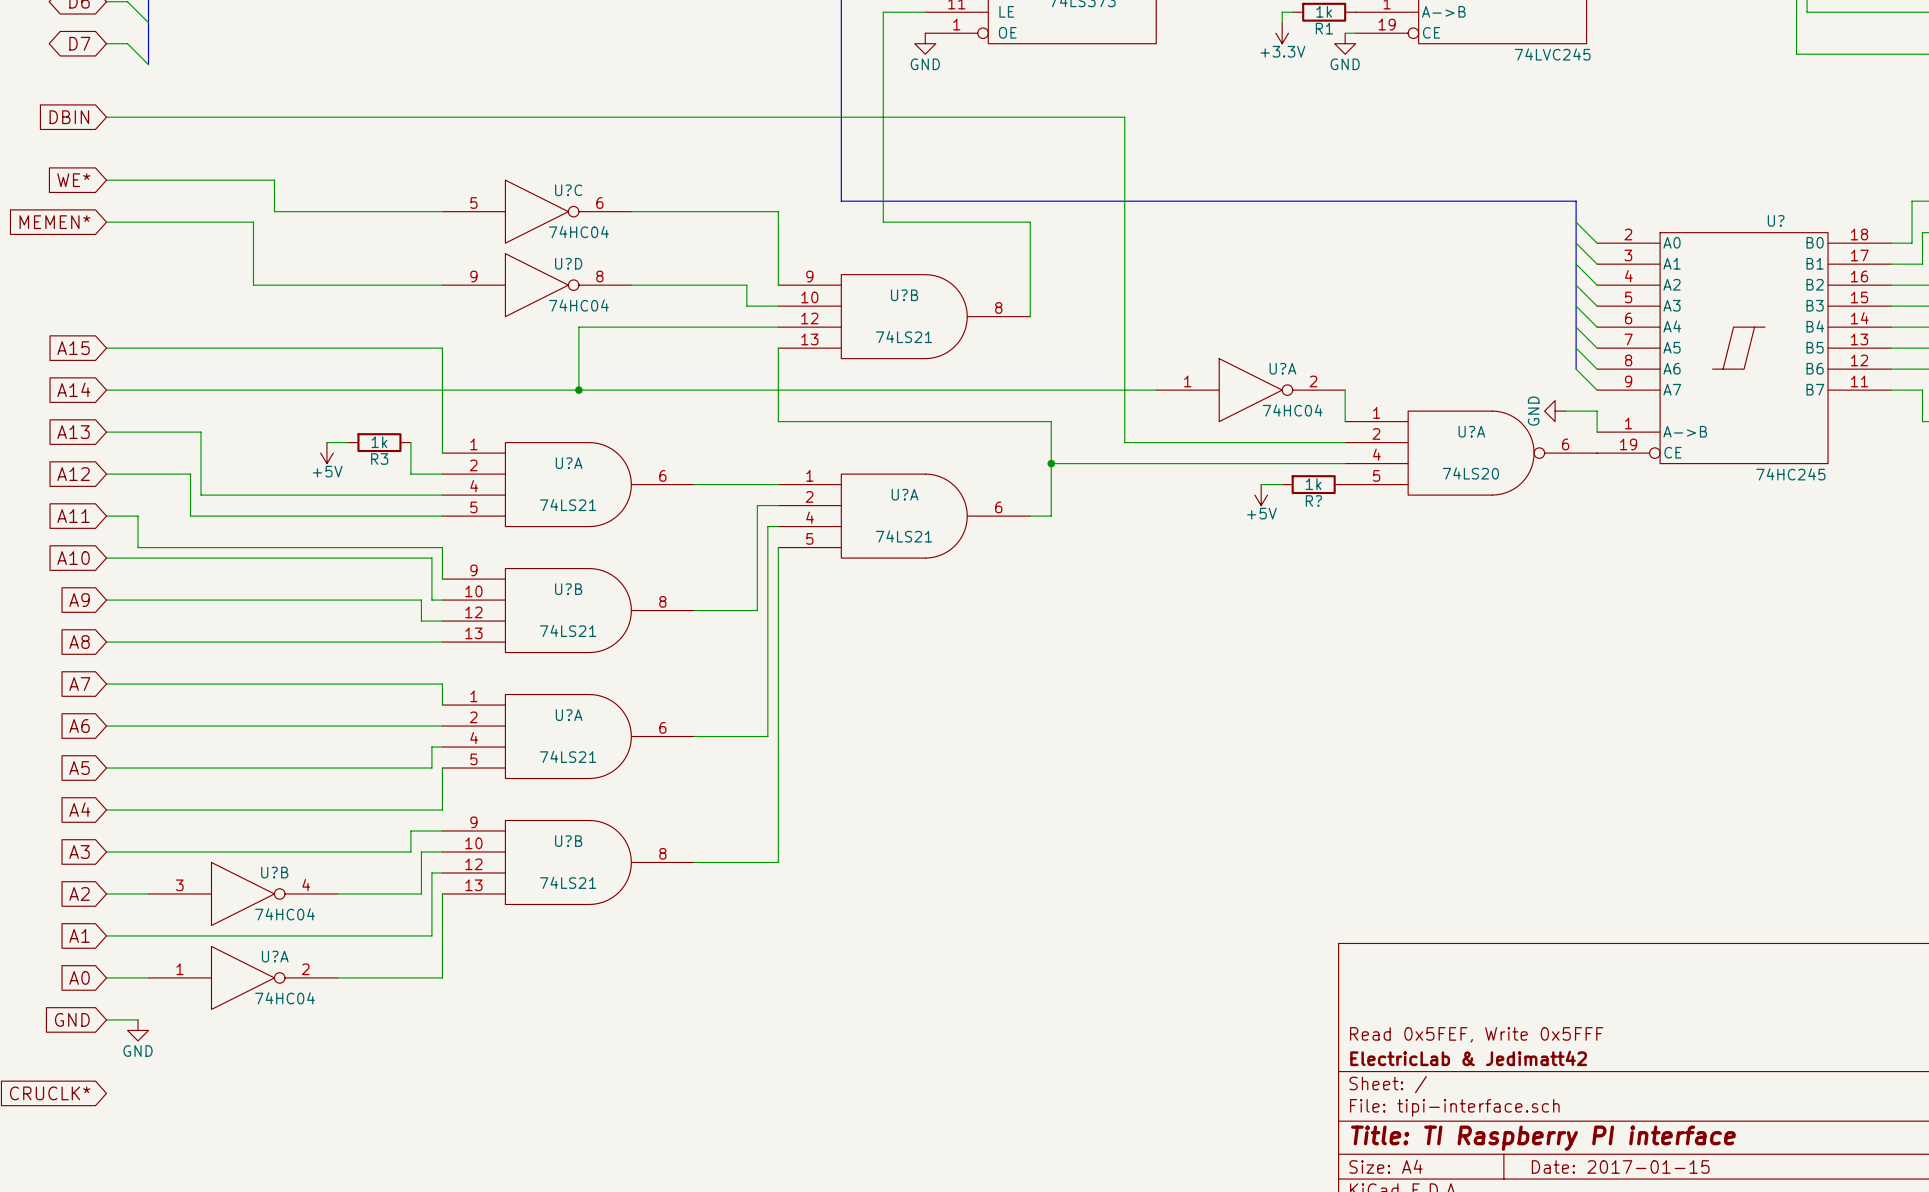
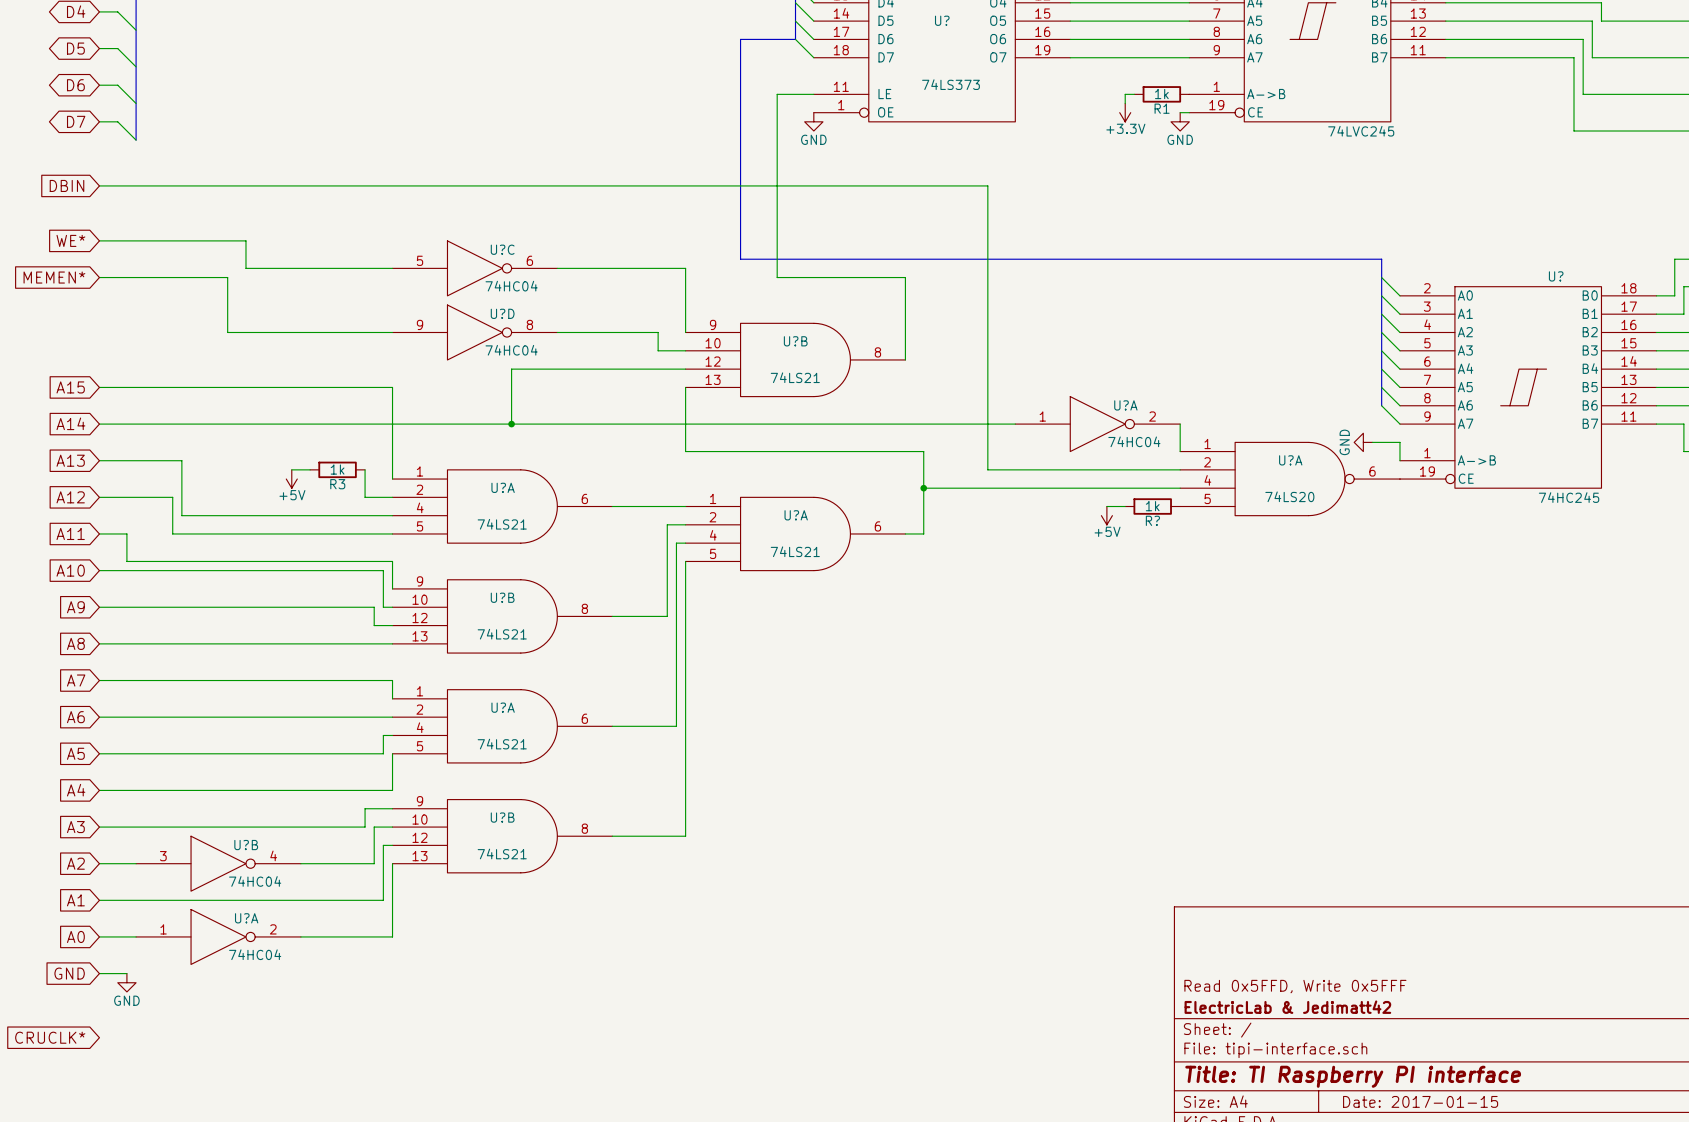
title block: Read 0x5FEF, Write 0x5FFF (1476, 1034) -> Read 0x5FFD, Write 0x5FFF (1295, 986)

